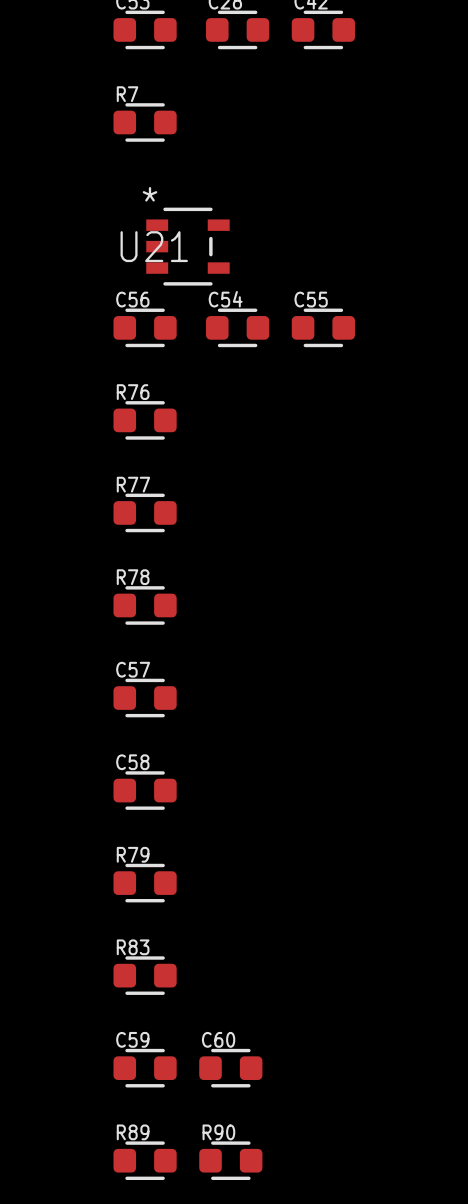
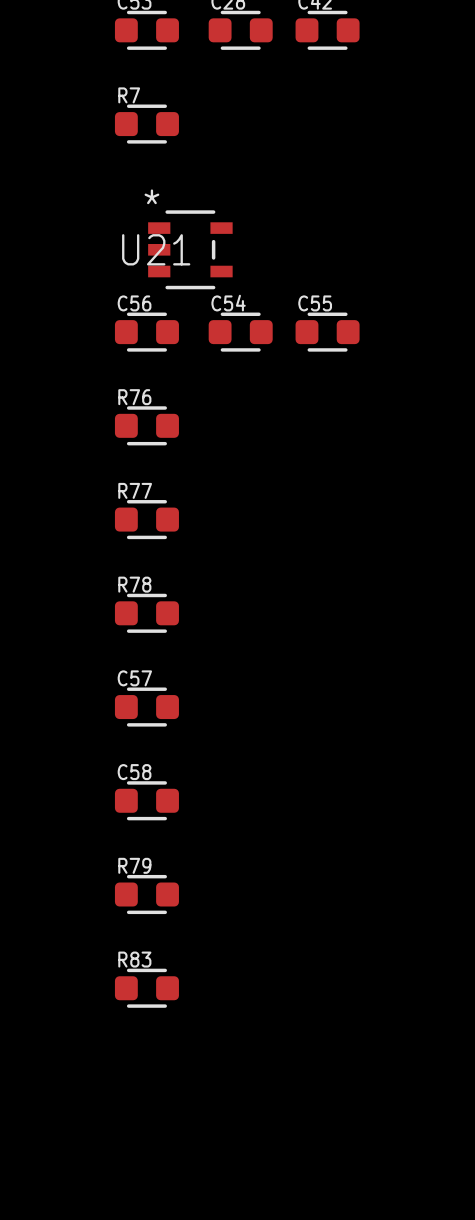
C59: (145, 1068) -> none
C60: (230, 1068) -> none
R89: (145, 1160) -> none
R90: (230, 1160) -> none

